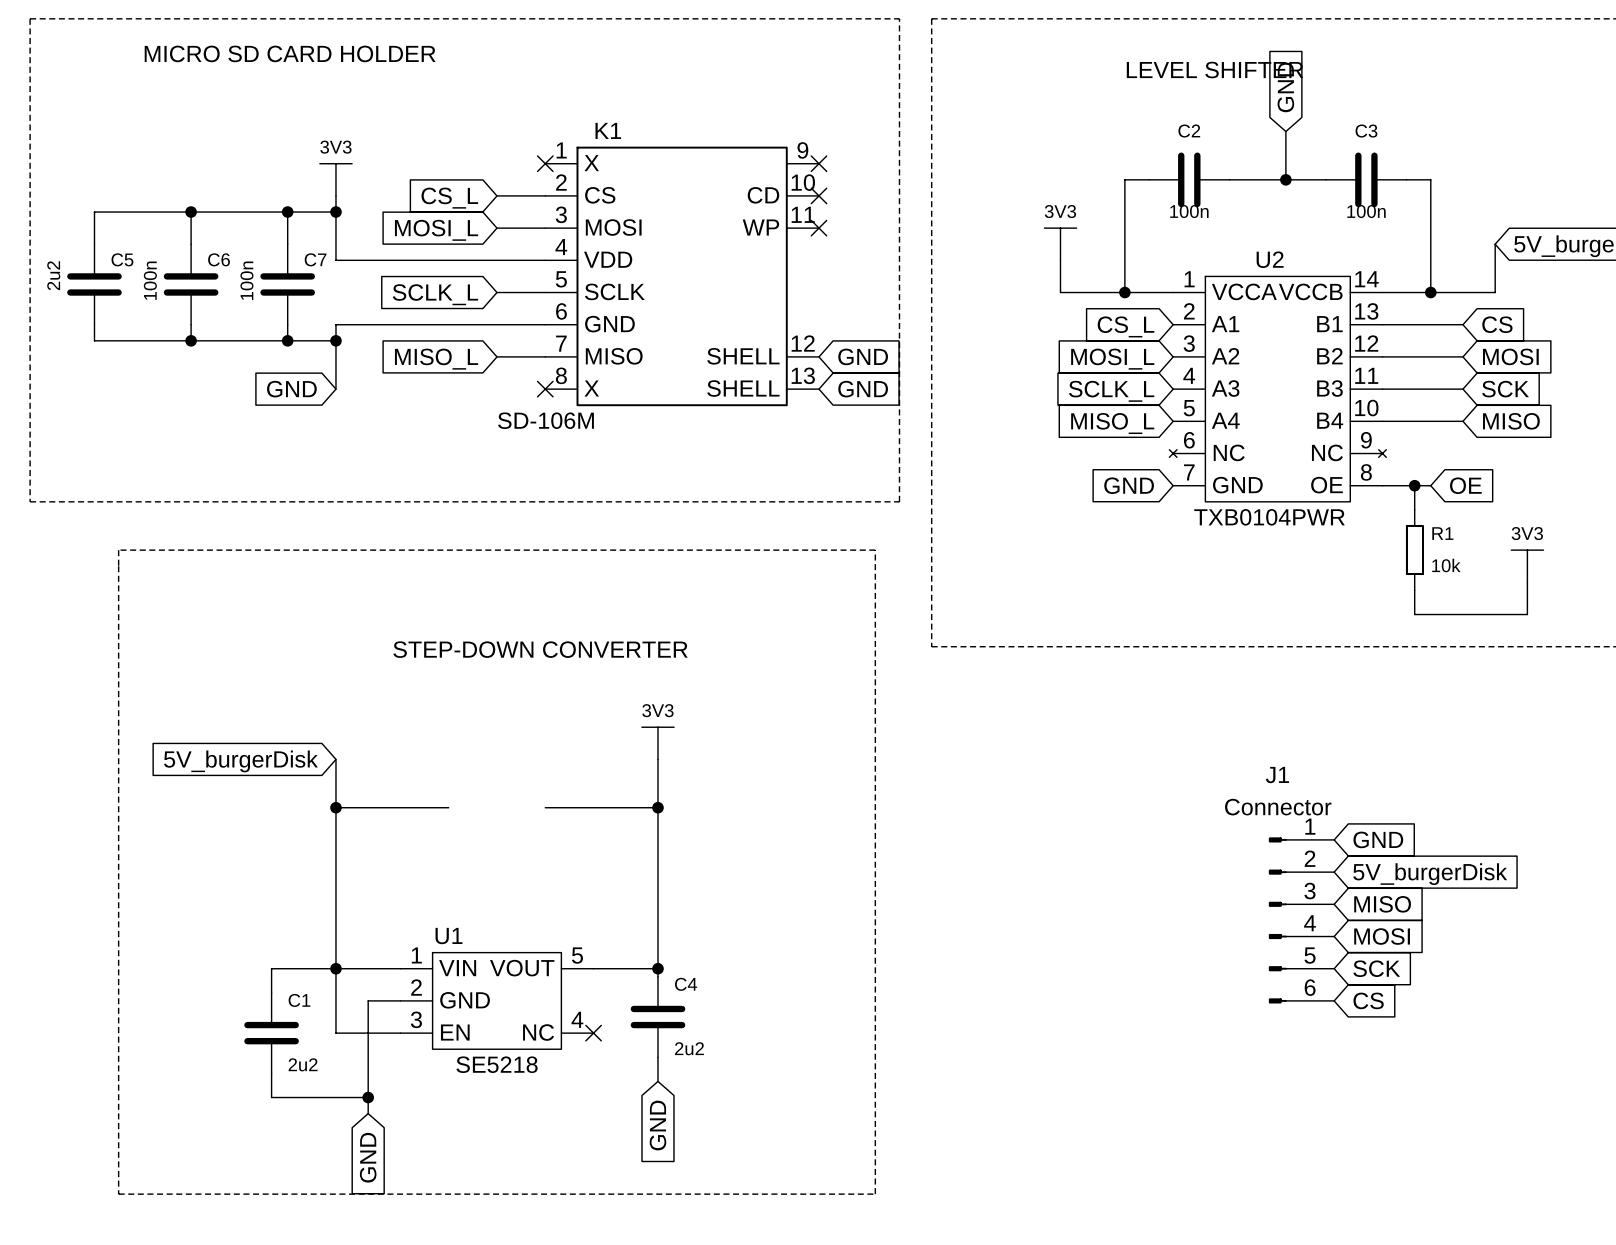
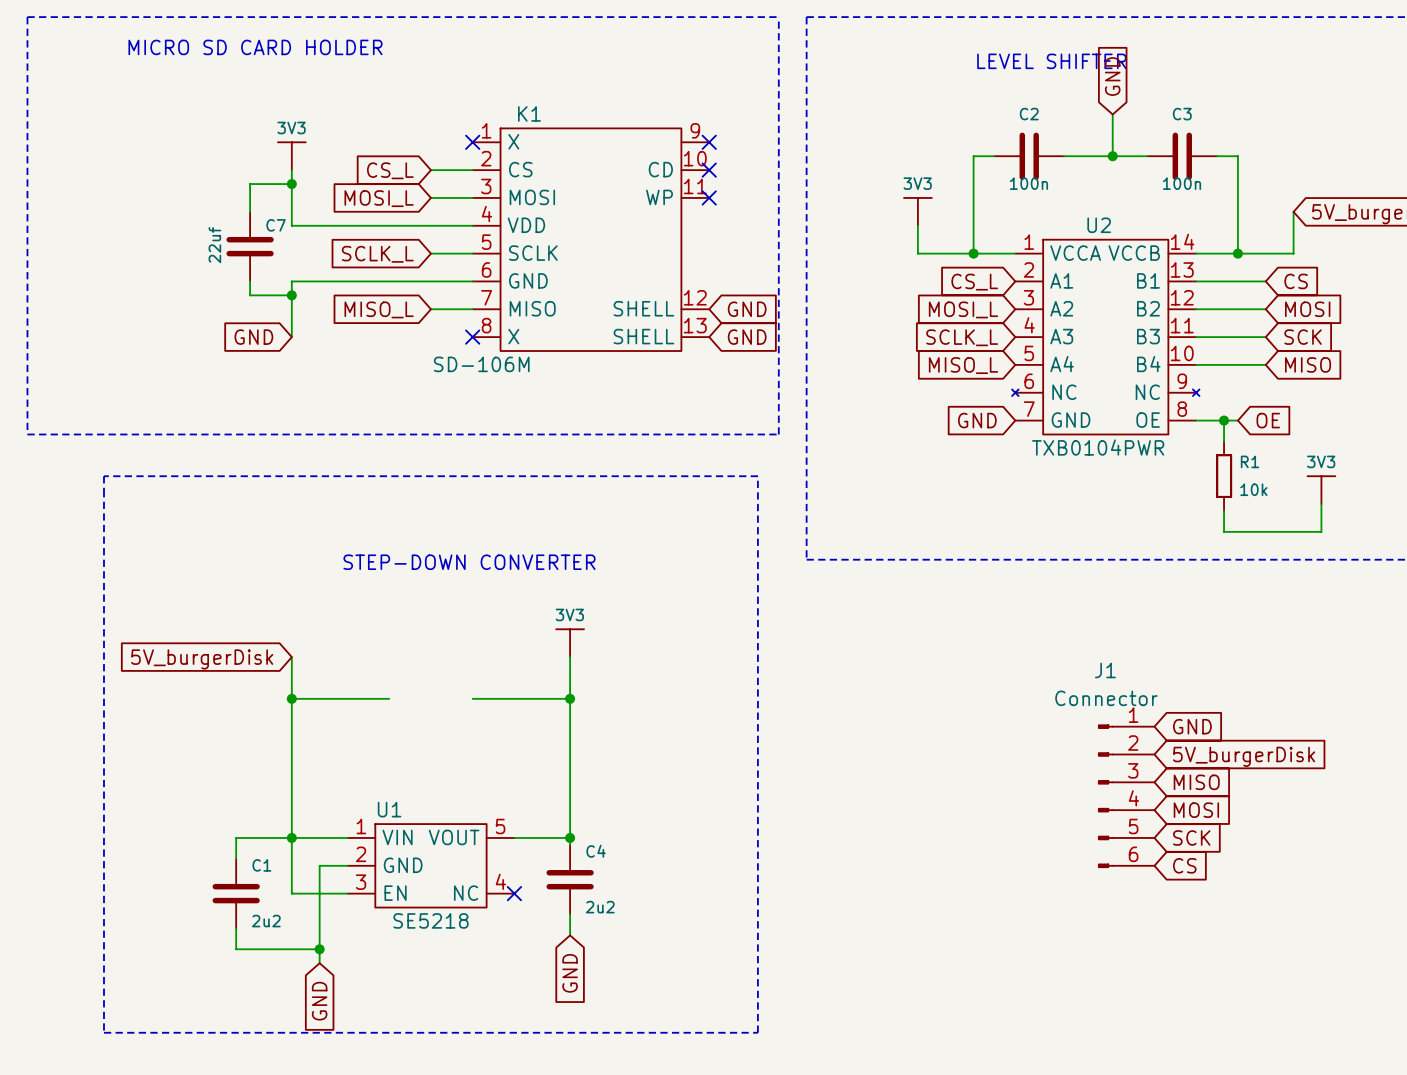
wire: (191, 212) (191, 244) -> none
junction: (191, 212) -> none
wire: (287, 212) (94, 212) (94, 244) -> none
junction: (287, 212) -> none
C7 value: 100n (246, 280) -> 22uf (214, 245)
C5: 2u2 (94, 284) -> none
C6: 100n (191, 284) -> none
wire: (94, 324) (94, 340) (287, 340) -> none
wire: (191, 324) (191, 340) -> none
junction: (191, 340) -> none
junction: (287, 340) -> none

